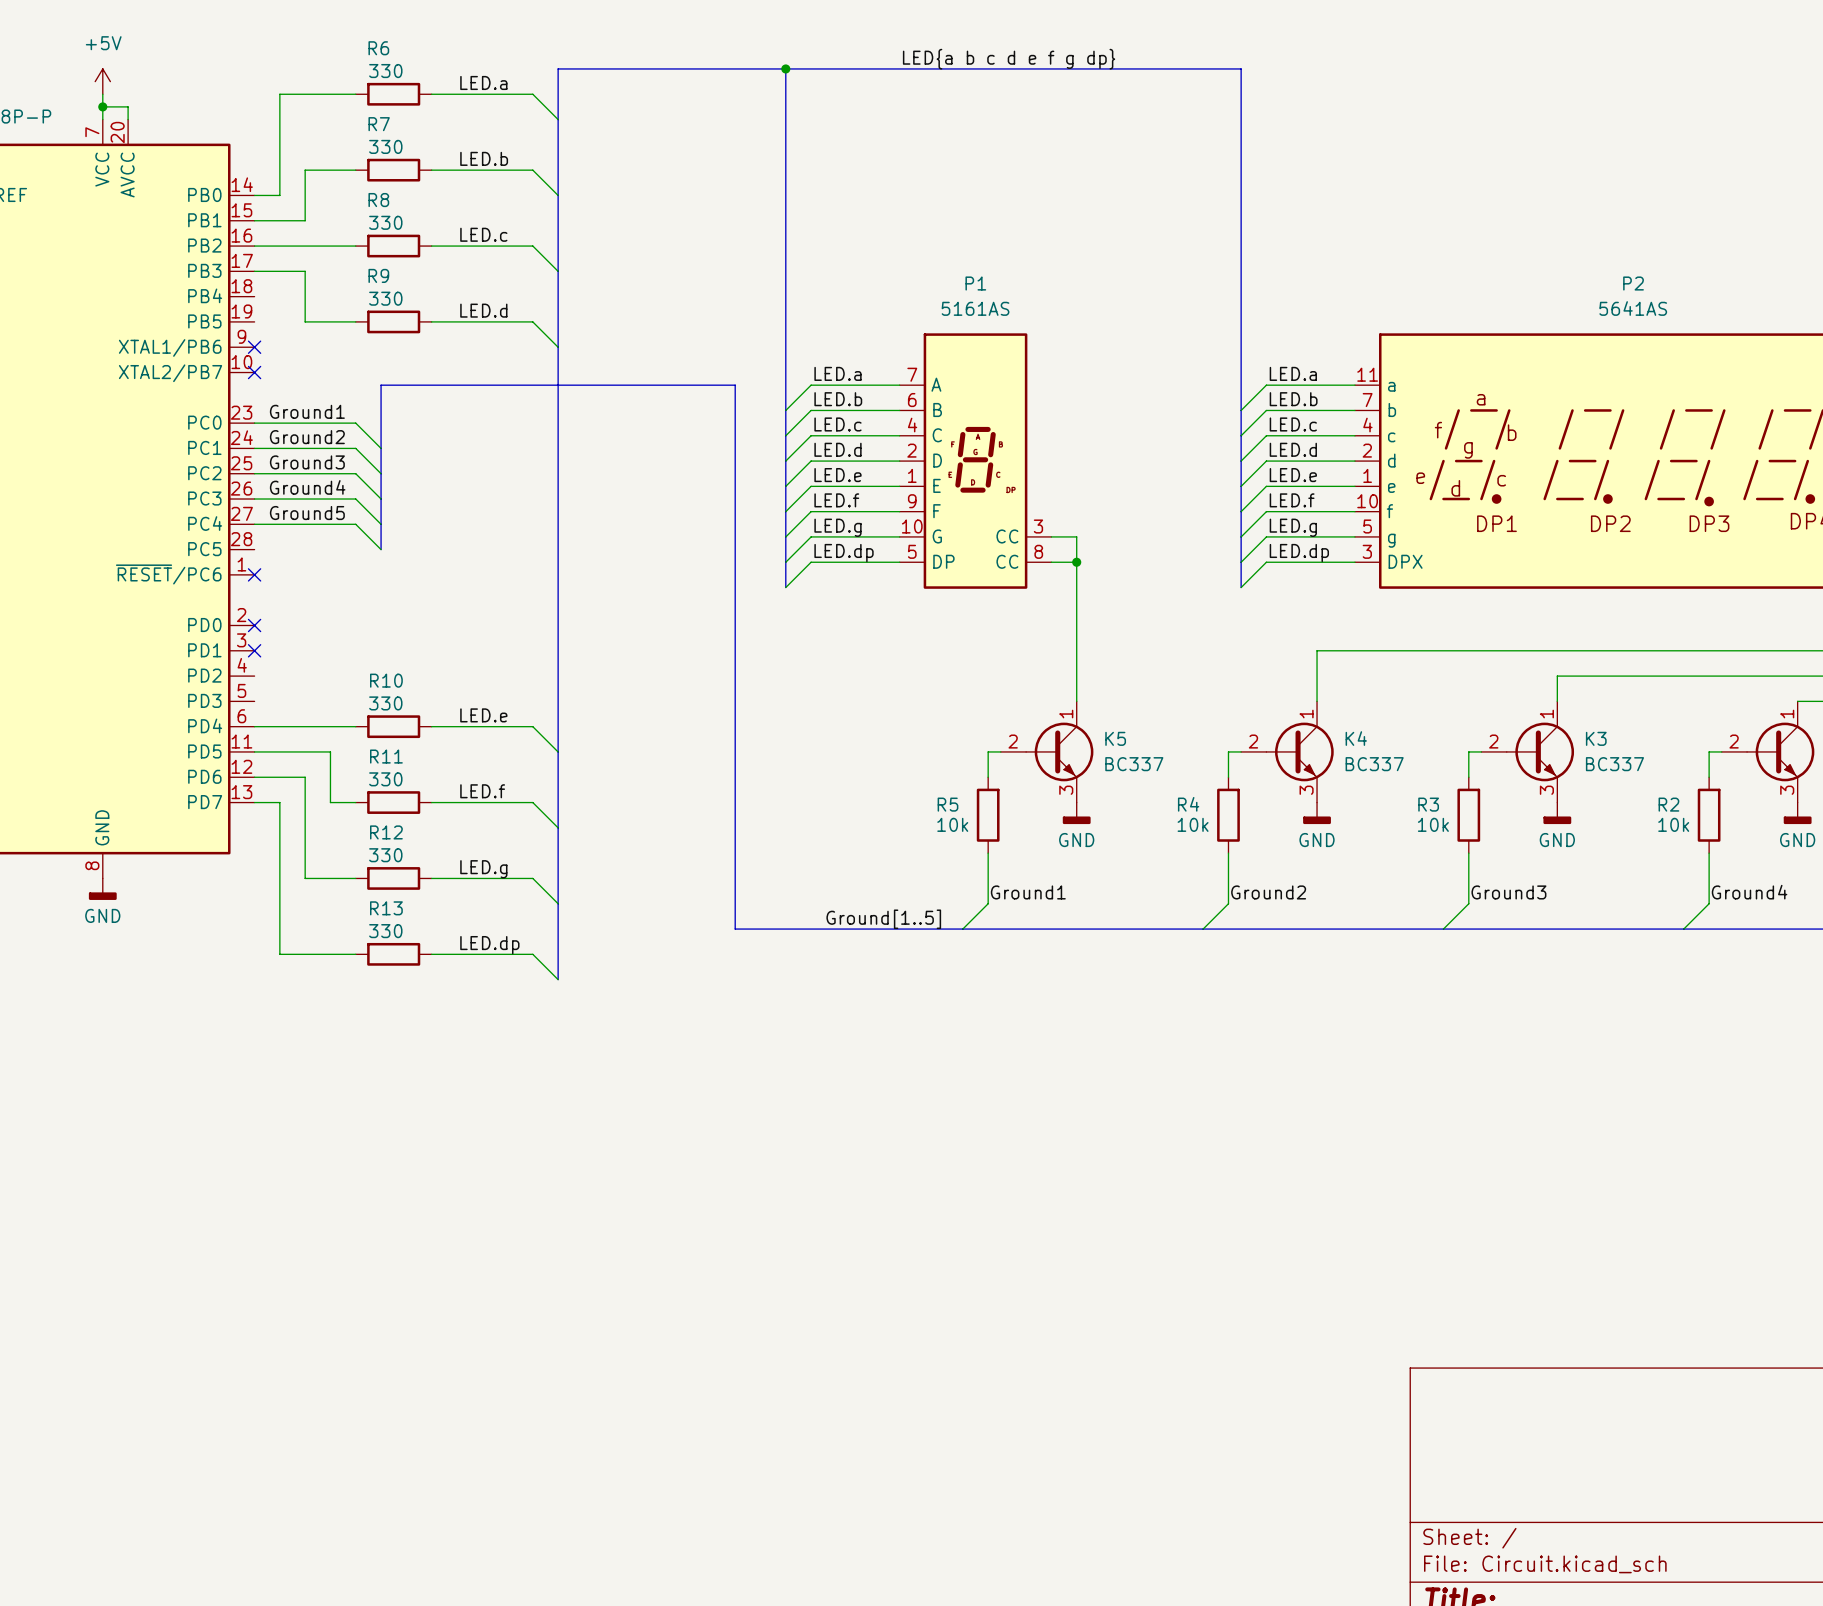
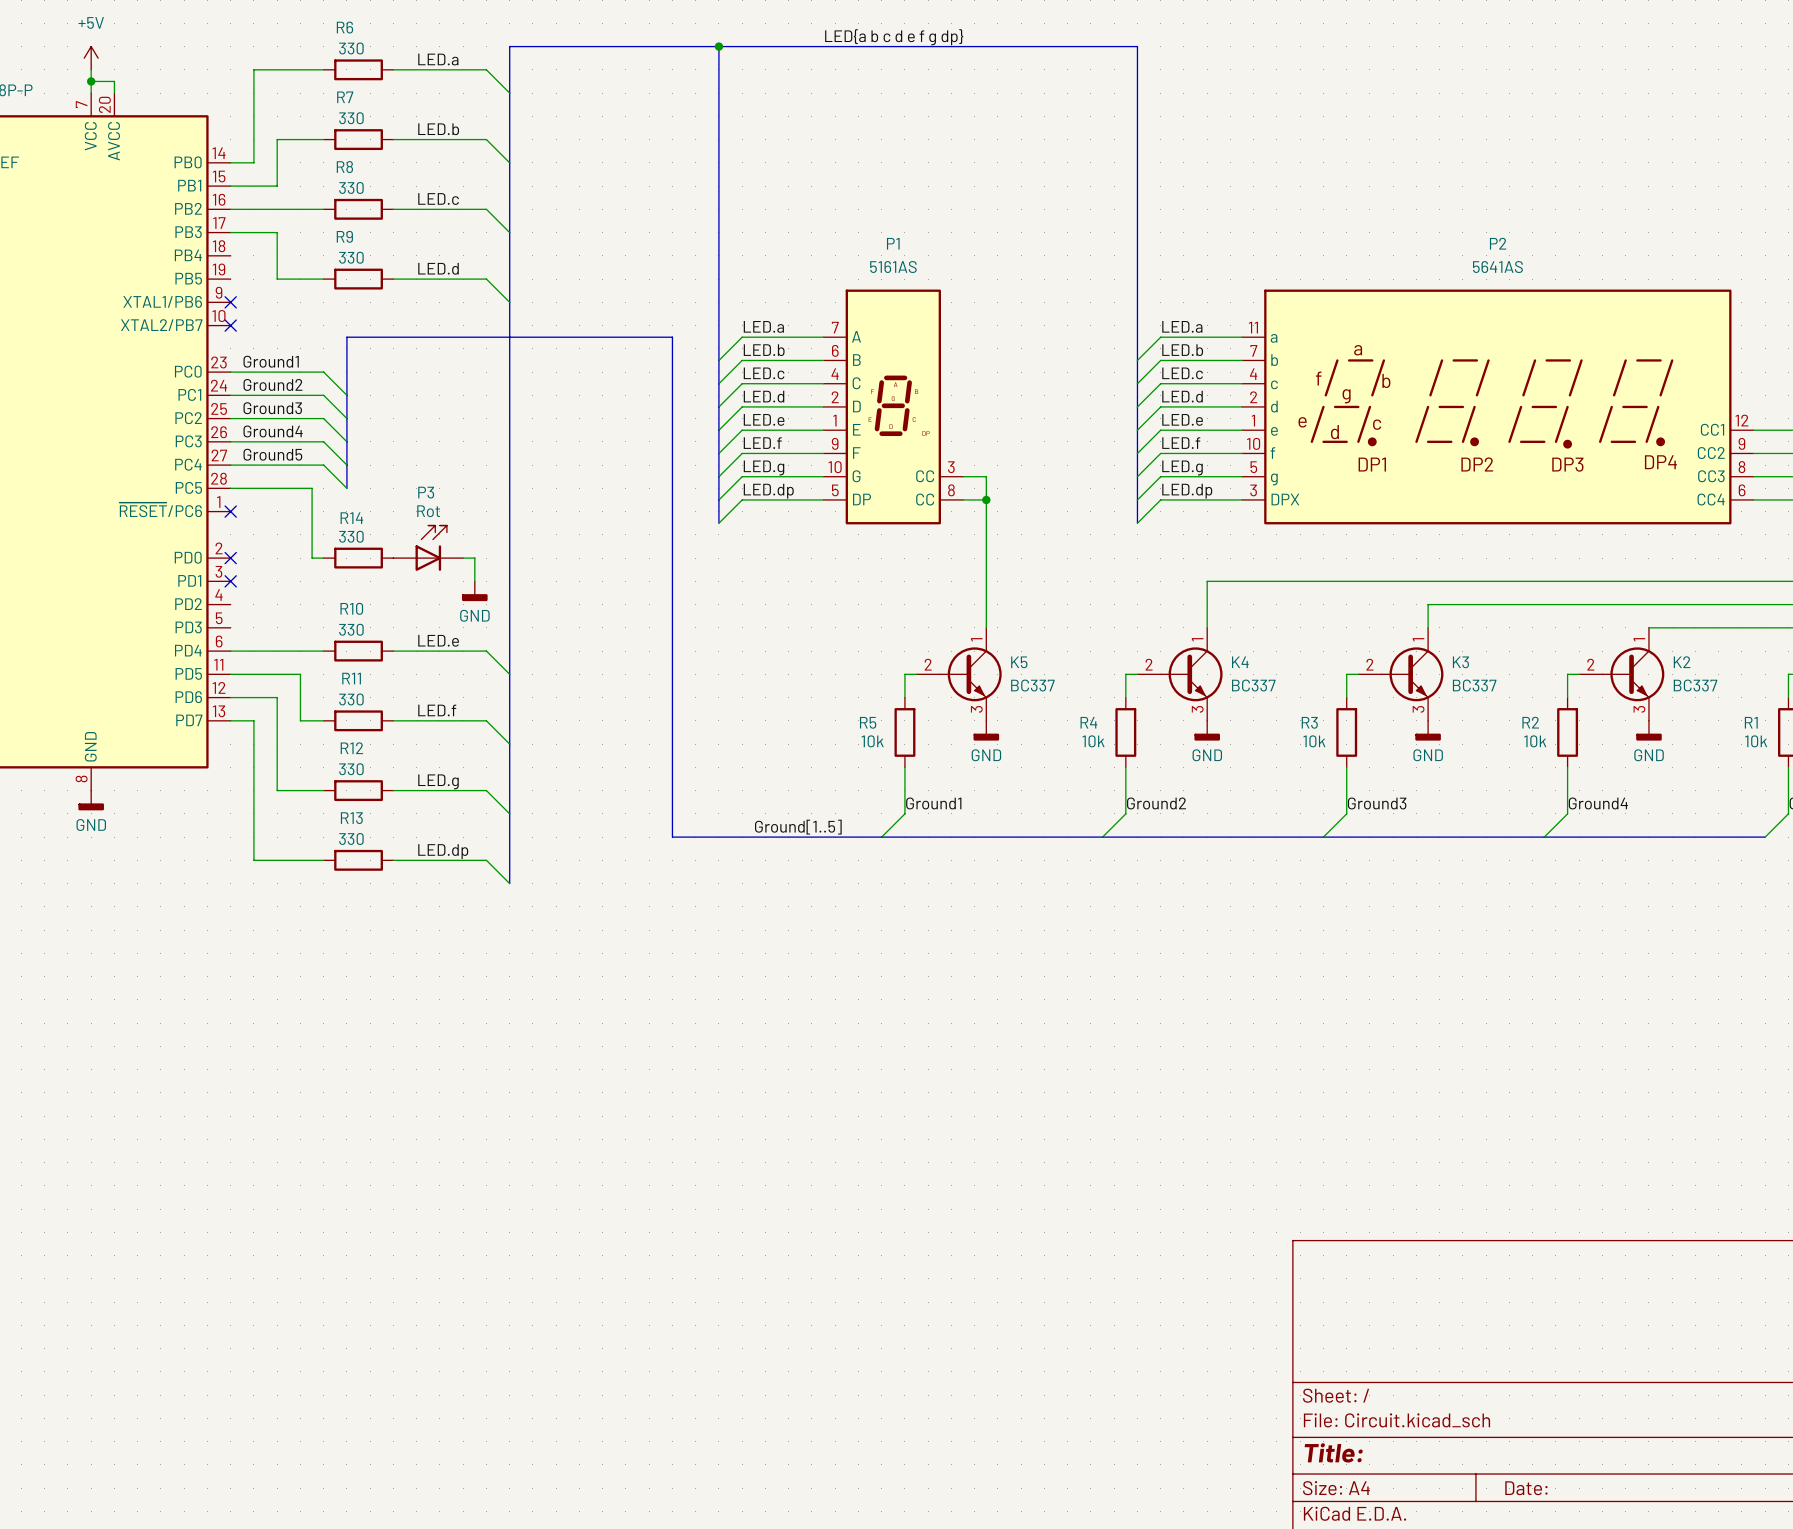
wire: none -> (230, 488) (312, 488) (312, 558) (323, 558)
P3: none -> Rot (428, 548)
R14: none -> 330 (358, 558)
wire: none -> (463, 558) (474, 558) (474, 581)
power symbol: none -> GND (474, 591)

